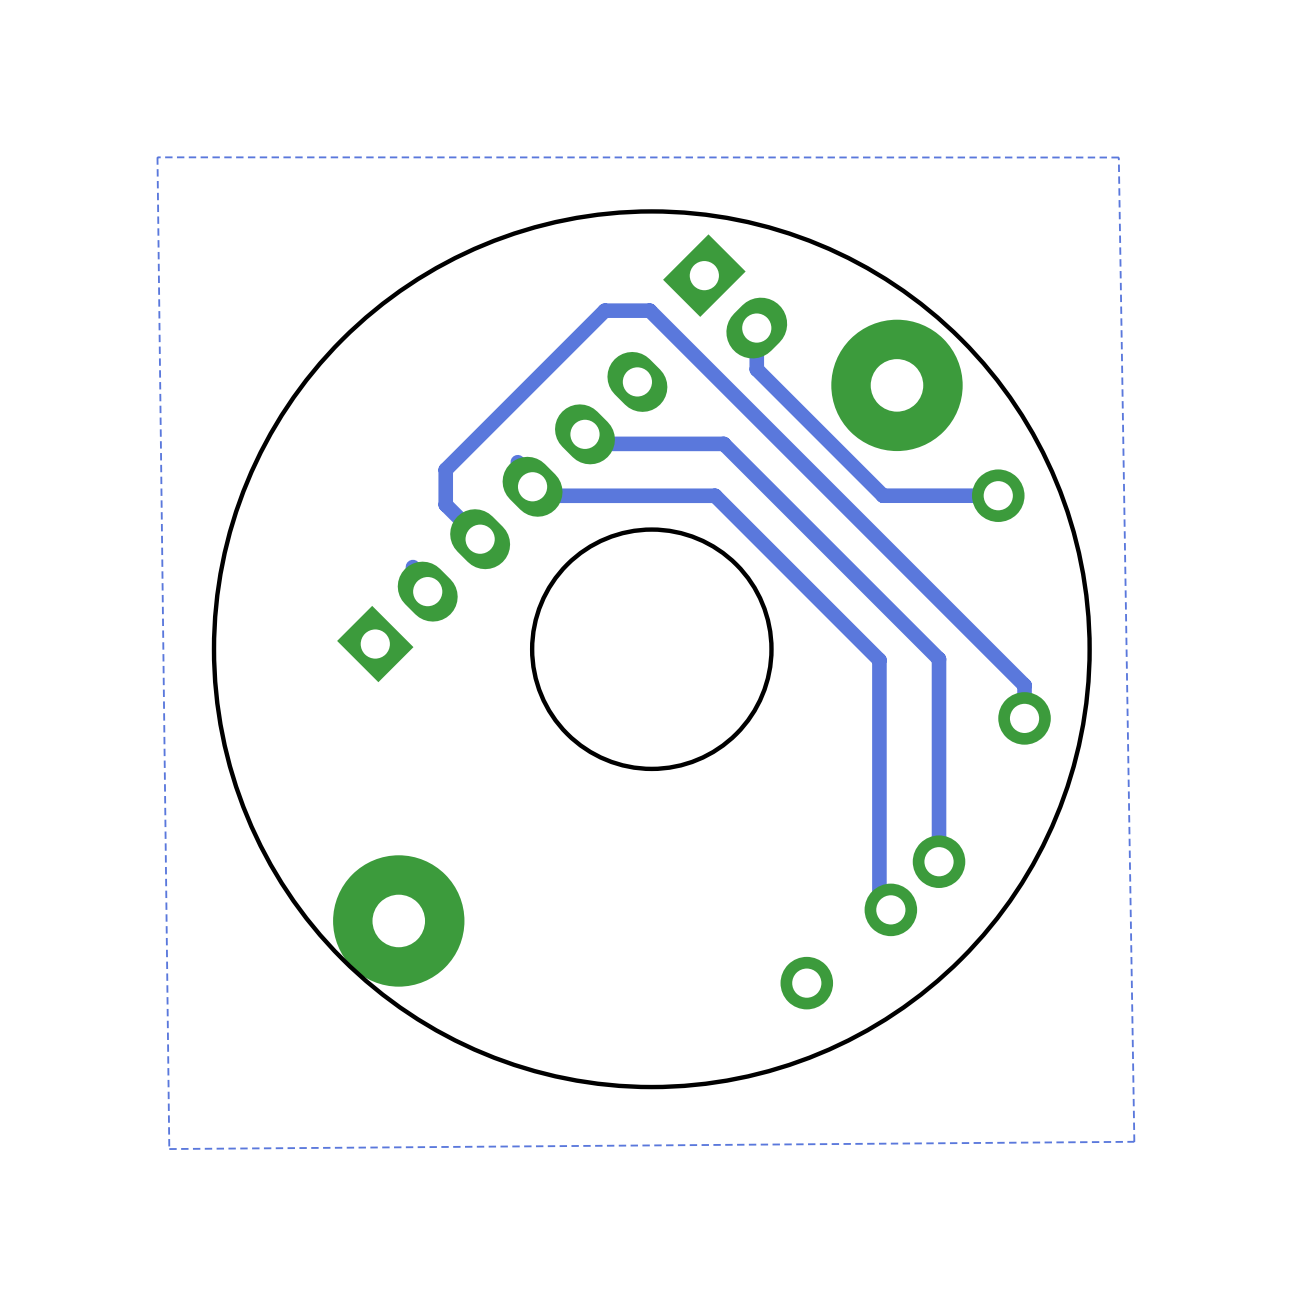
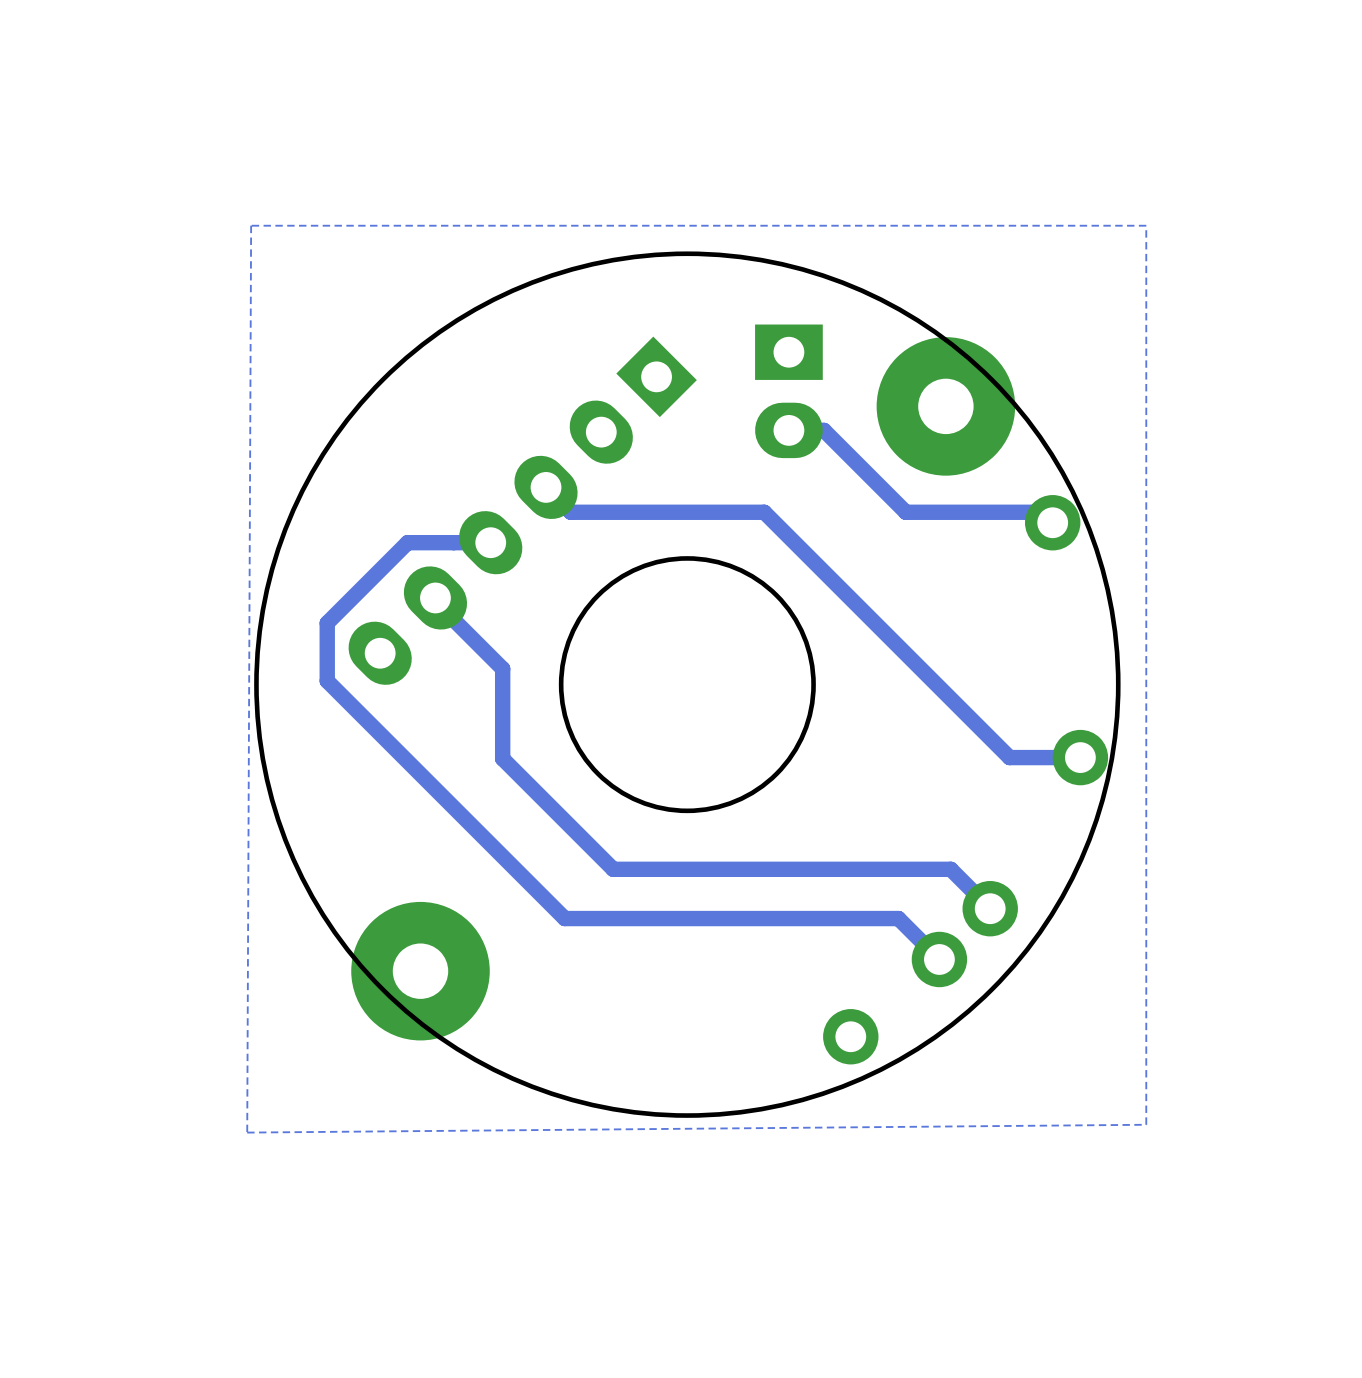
zone outline: (1118, 157) (157, 157) (169, 1149) (1134, 1141) (1118, 157) -> (1146, 225) (1146, 1124) (247, 1132) (251, 225) (1146, 225)
round board edge size: [211, 209, 1092, 1090] -> [254, 251, 1121, 1118]
part: (725, 296) -> none
track: (756, 328) (756, 369) (883, 495) (998, 495) -> none
part: none -> (788, 391)
track: none -> (788, 430) (824, 430) (905, 512) (1042, 512)
track: (584, 434) (594, 443) (723, 443) (939, 659) (939, 861) -> (435, 601) (502, 668) (502, 758) (613, 869) (950, 869) (990, 908)
track: (532, 486) (541, 495) (715, 495) (879, 660) (879, 898) -> (490, 542) (407, 542) (327, 623) (327, 681) (564, 918) (898, 918) (927, 947)
part rotation: 0° (502, 517) -> 180° (522, 510)
track: (480, 539) (445, 504) (445, 469) (604, 310) (649, 310) (1024, 685) (1024, 718) -> (570, 512) (764, 512) (1009, 757) (1080, 757)

